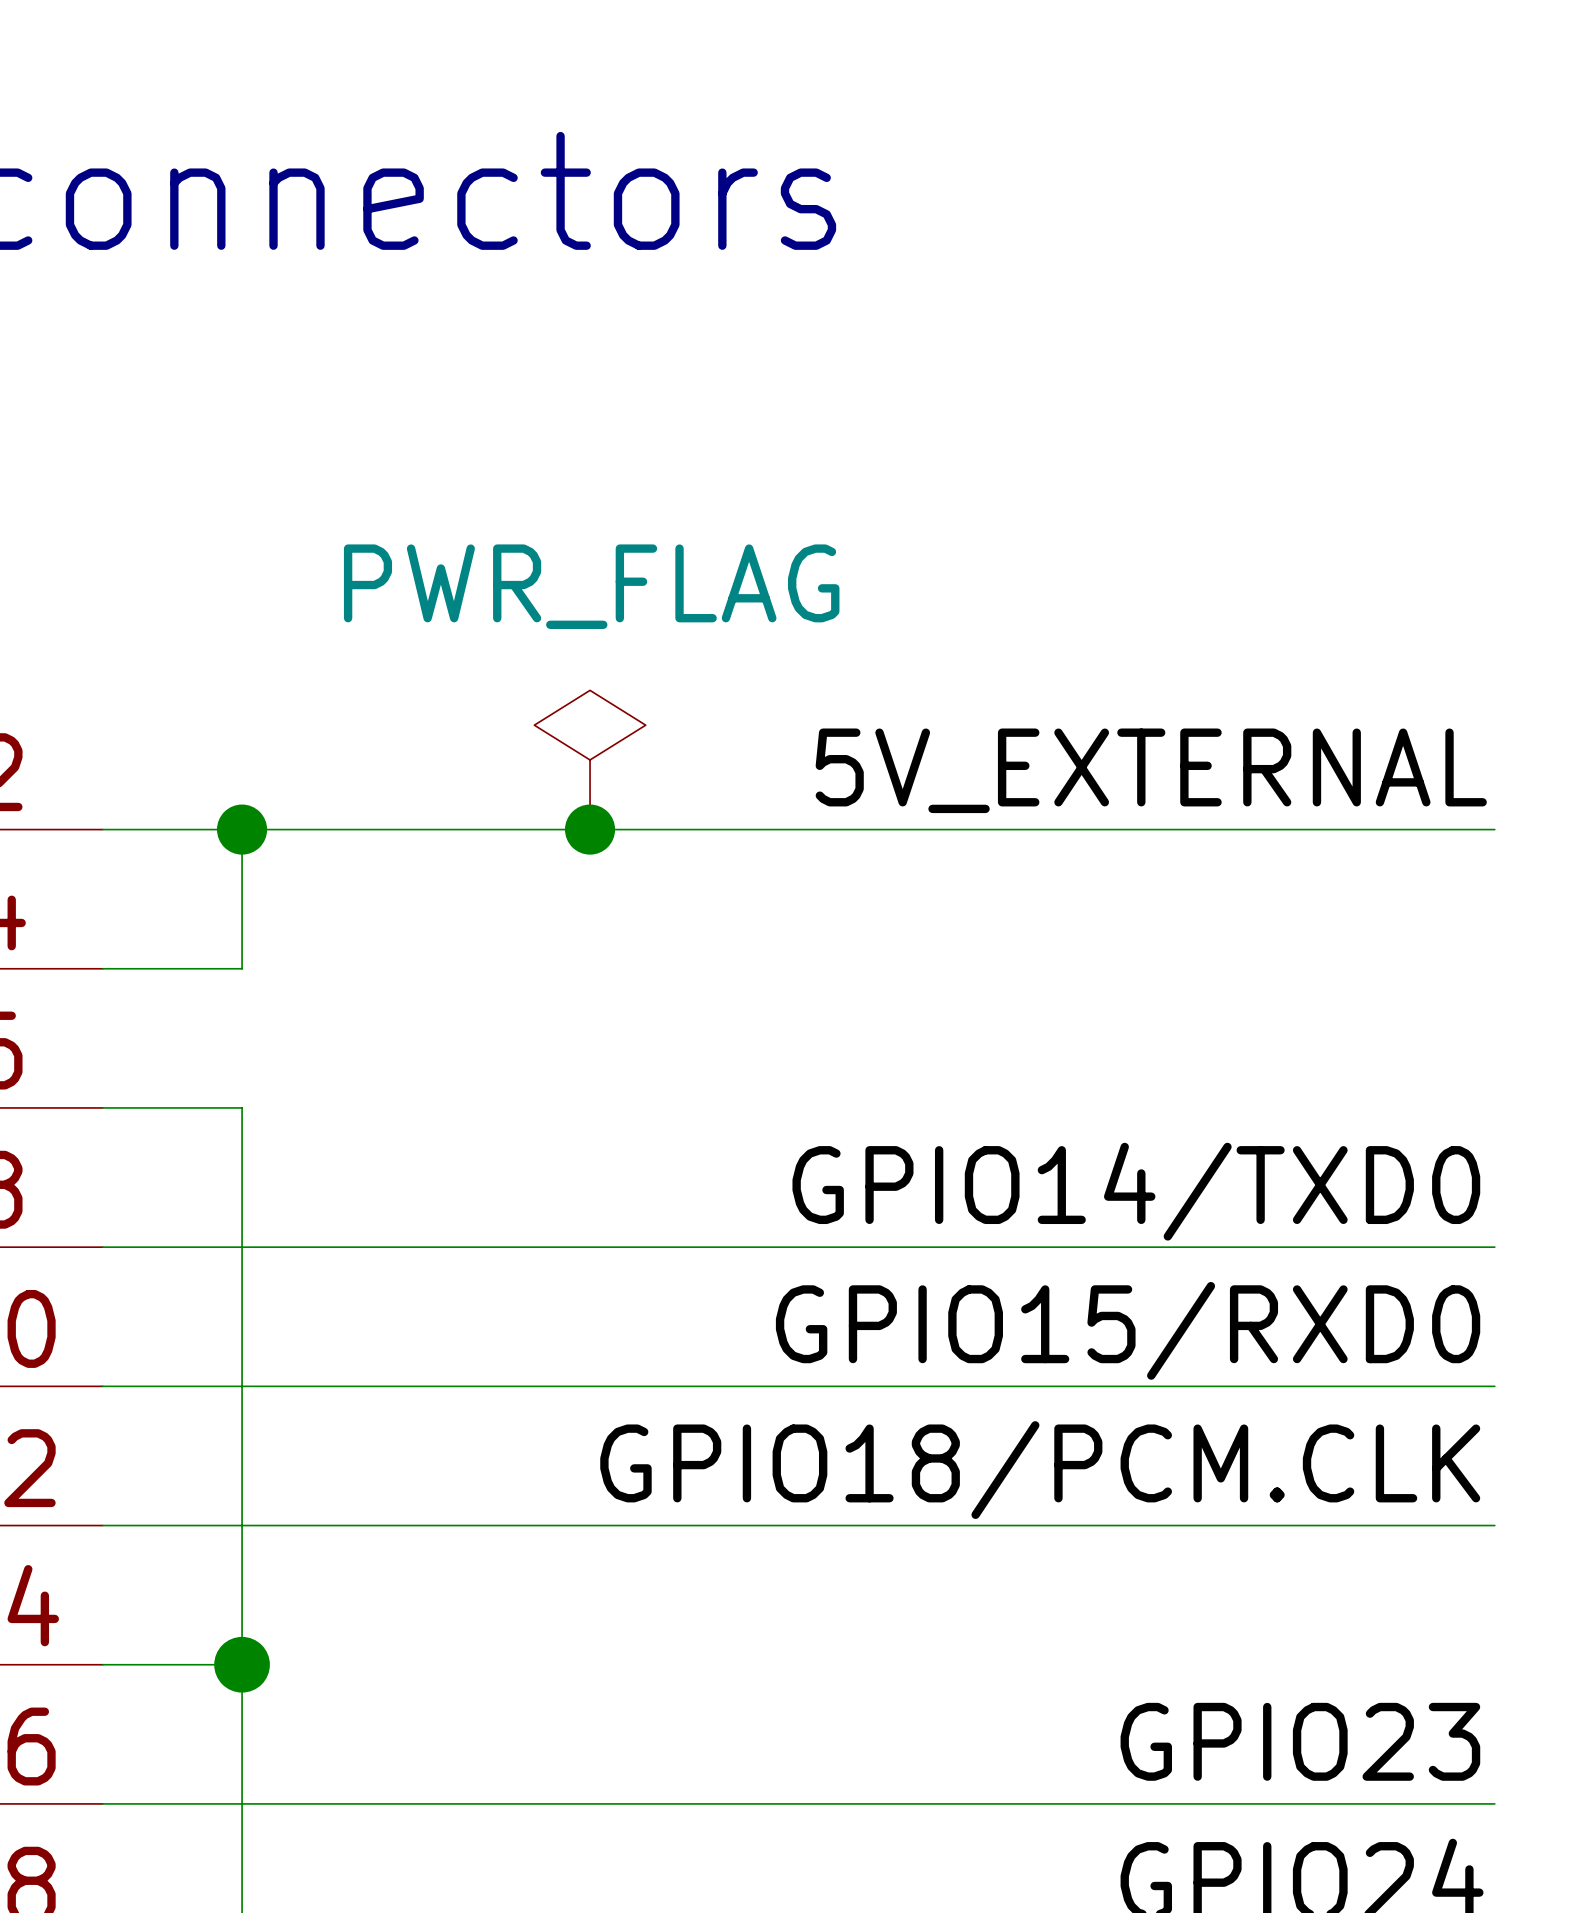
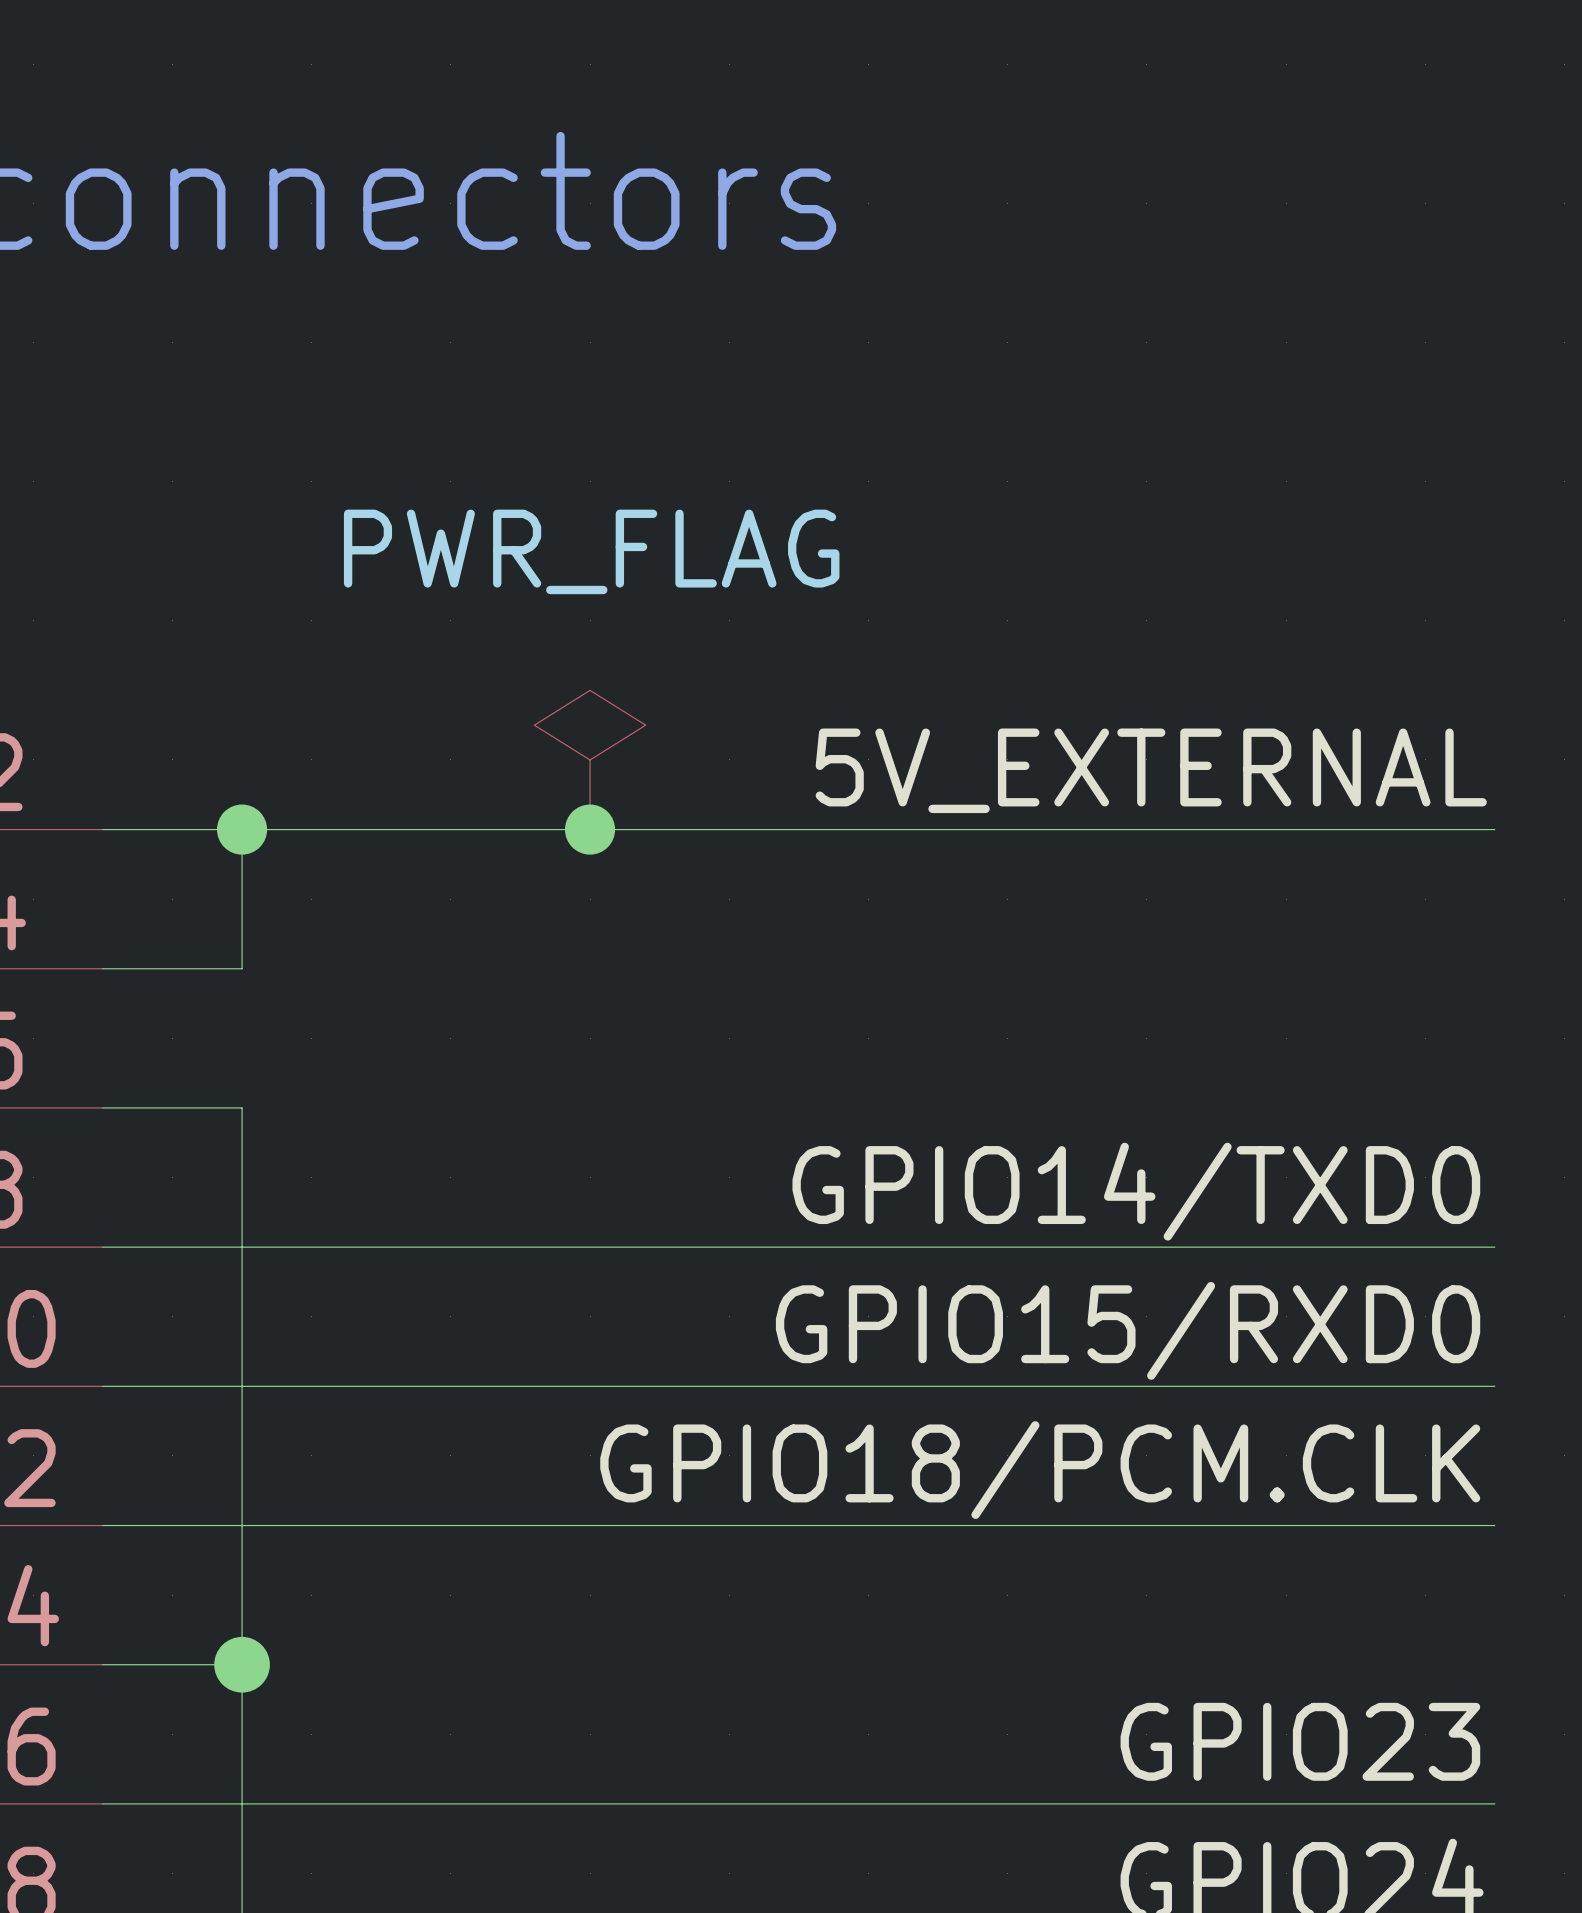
power symbol text position: PWR_FLAG (591, 586) -> PWR_FLAG (591, 551)

